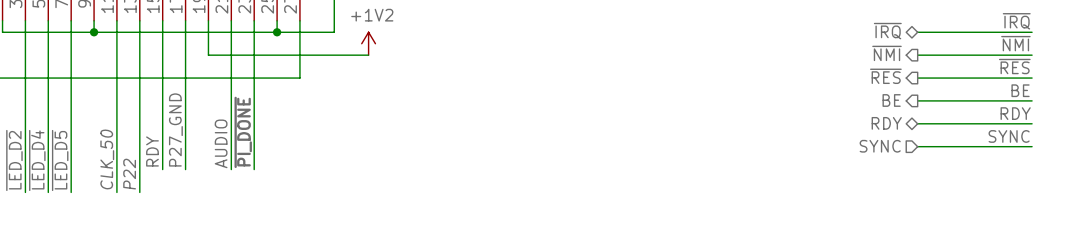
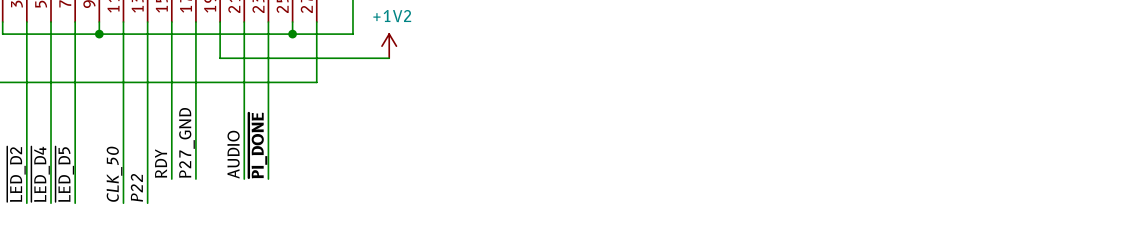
label: ~{IRQ} (1016, 21) -> none
hierarchical label: ~{IRQ} (887, 31) -> none
wire: (917, 32) (1032, 32) -> none
label: ~{NMI} (1015, 43) -> none
hierarchical label: ~{NMI} (886, 53) -> none
wire: (917, 55) (1032, 55) -> none
label: ~{RES} (1014, 66) -> none
hierarchical label: ~{RES} (885, 76) -> none
wire: (917, 78) (1032, 78) -> none
label: BE (1020, 90) -> none
hierarchical label: BE (891, 100) -> none
wire: (917, 100) (1032, 100) -> none
label: RDY (1015, 113) -> none
hierarchical label: RDY (886, 123) -> none
wire: (917, 123) (1032, 123) -> none
label: SYNC (1009, 136) -> none
hierarchical label: SYNC (880, 146) -> none
wire: (917, 146) (1032, 146) -> none

